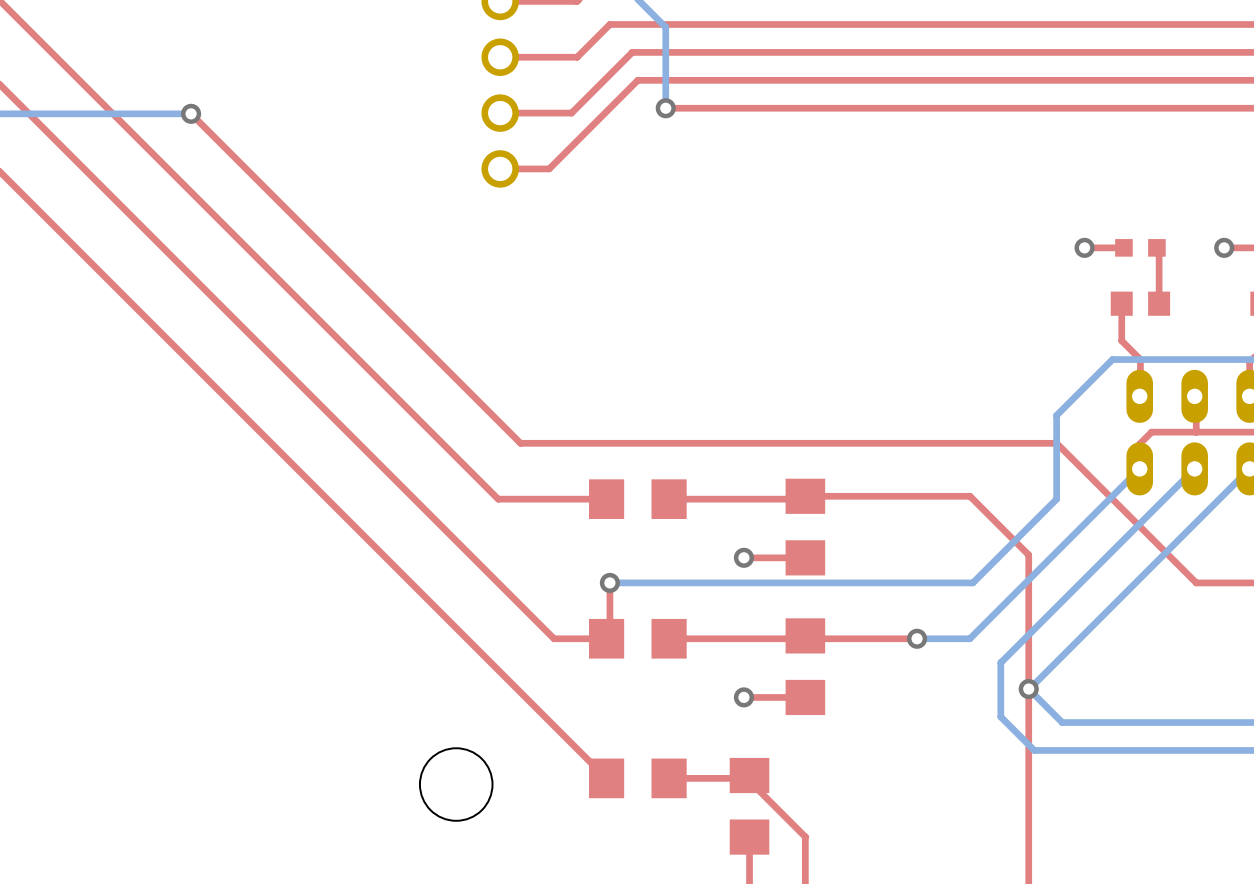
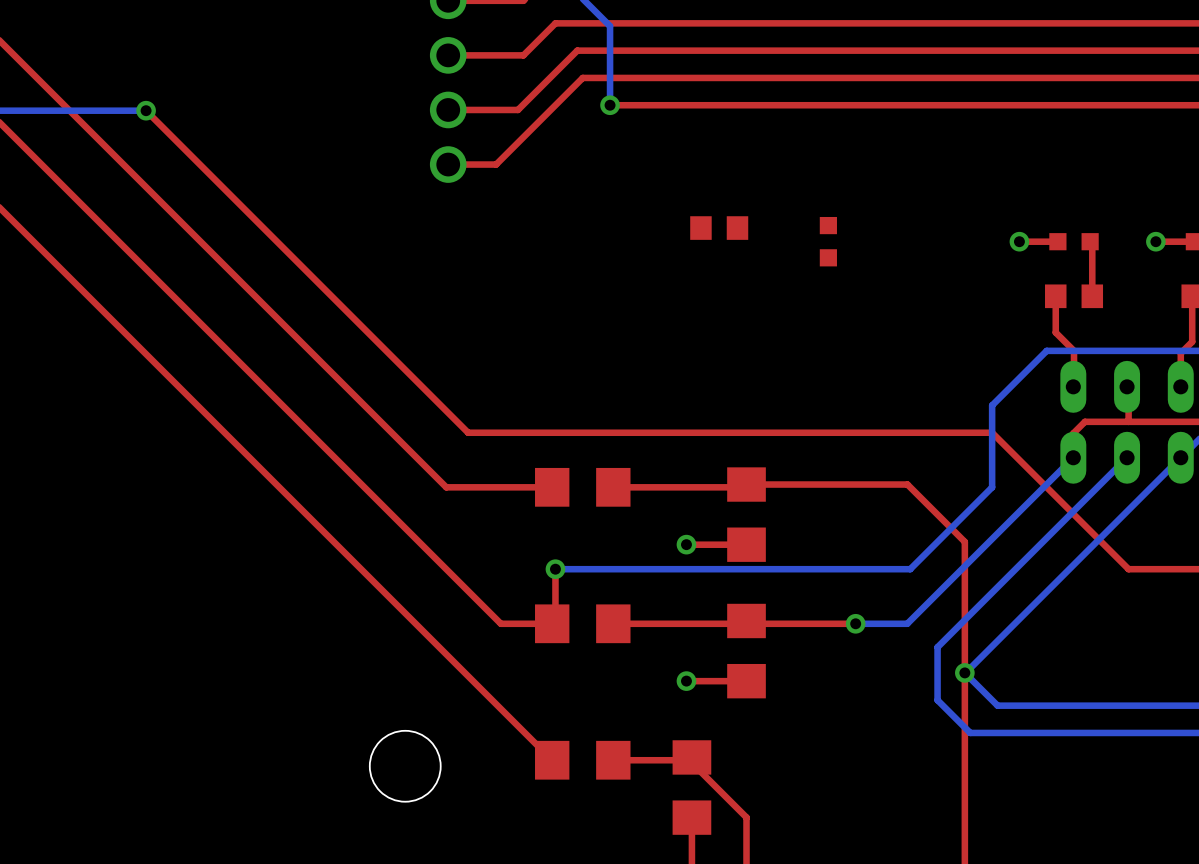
part: none -> (719, 228)
part: none -> (828, 241)

